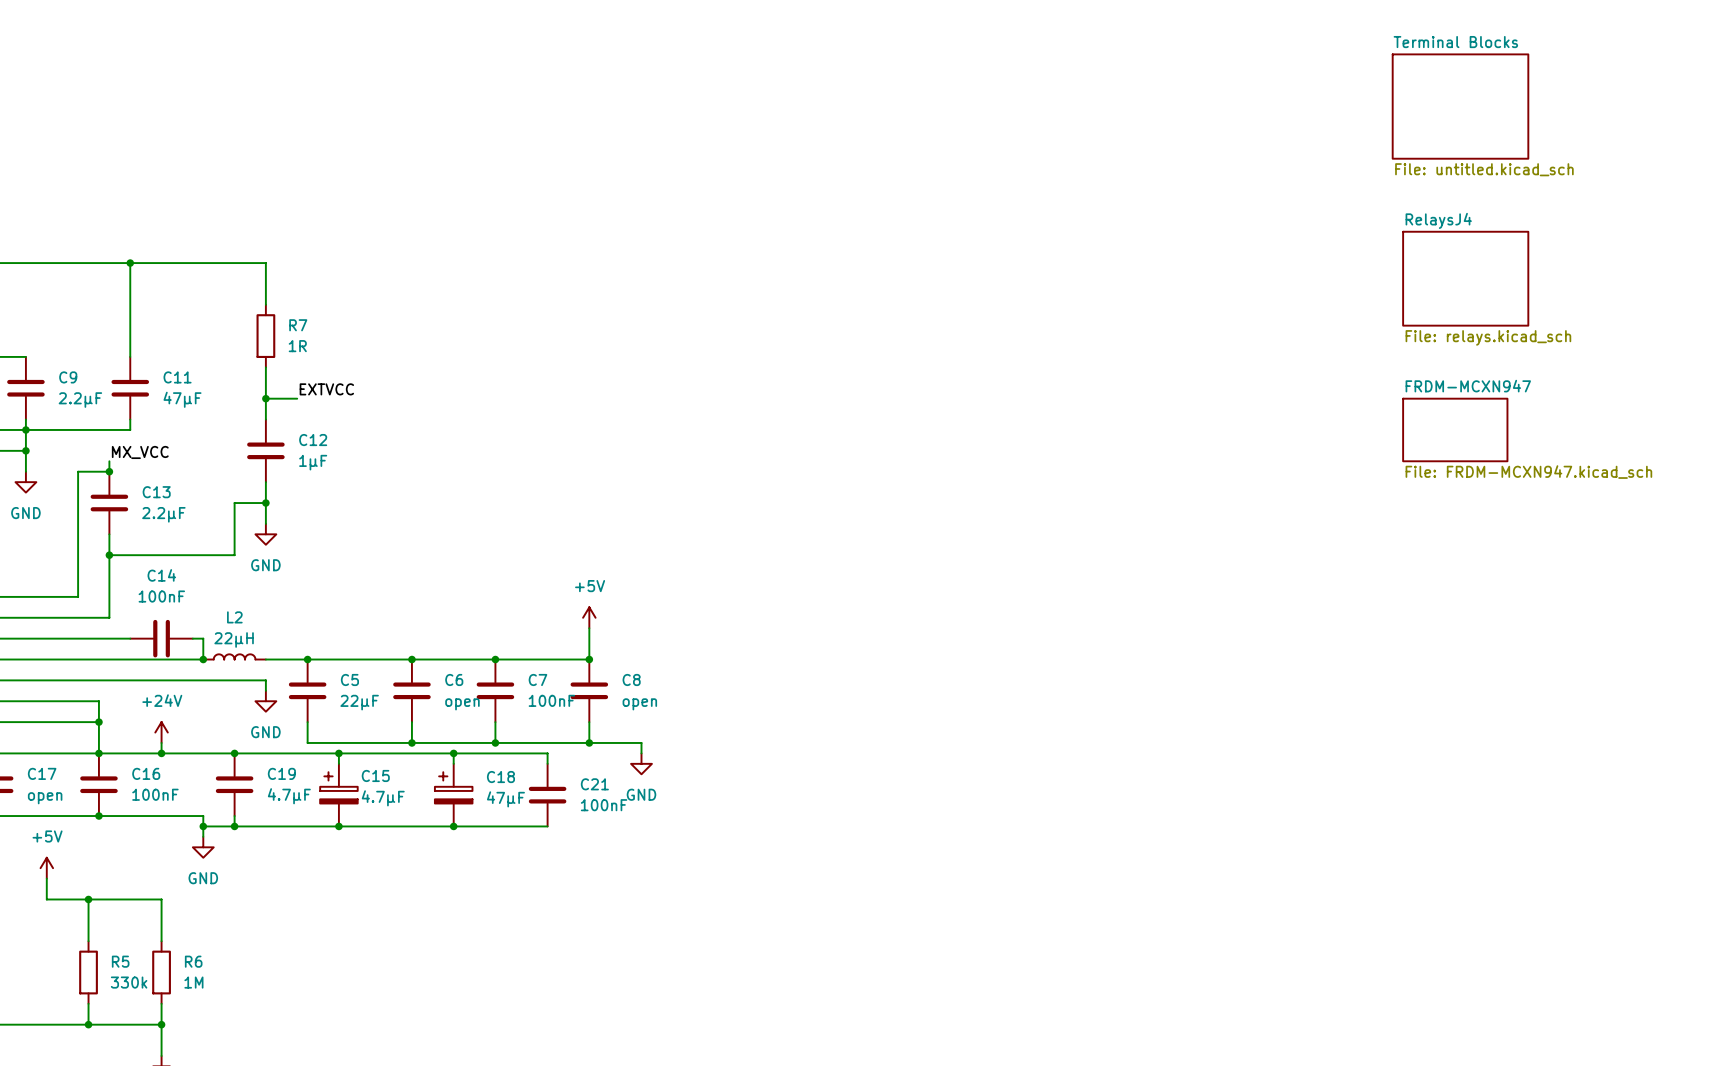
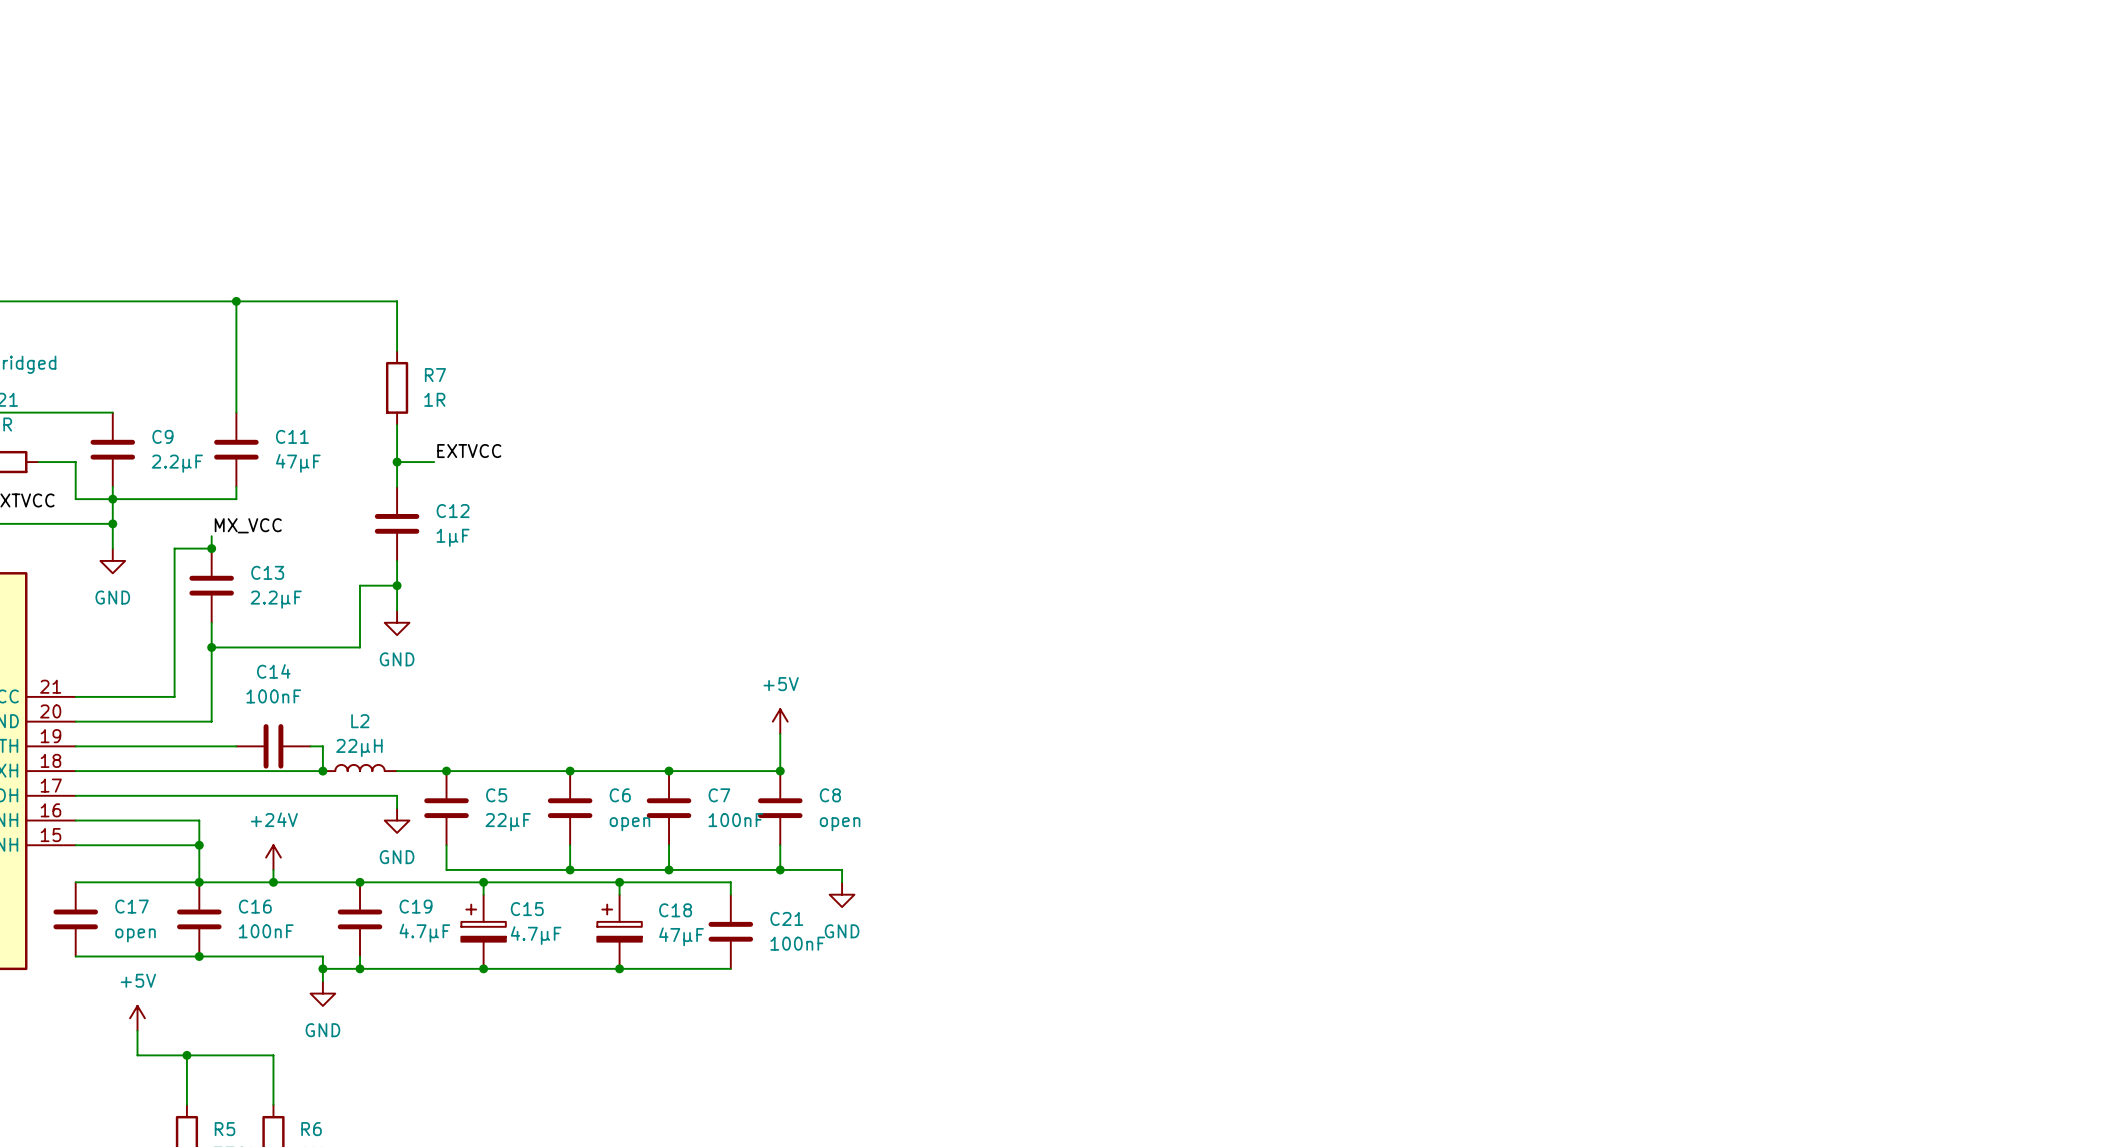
sheet Terminal Blocks: File: untitled.kicad_sch (1460, 106) -> none
sheet RelaysJ4: File: relays.kicad_sch (1465, 278) -> none
sheet FRDM-MCXN947: File: FRDM-MCXN947.kicad_sch (1455, 429) -> none

